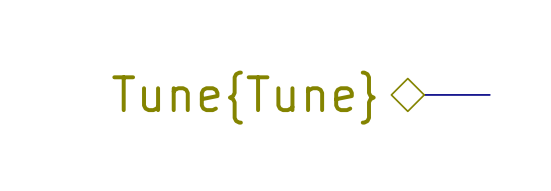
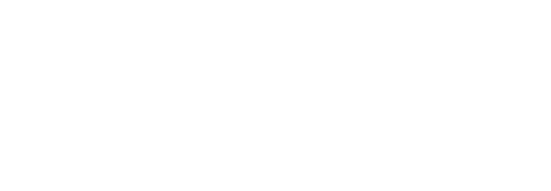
bus: (424, 94) (489, 94) -> none
hierarchical label: Tune{Tune} (244, 97) -> none

